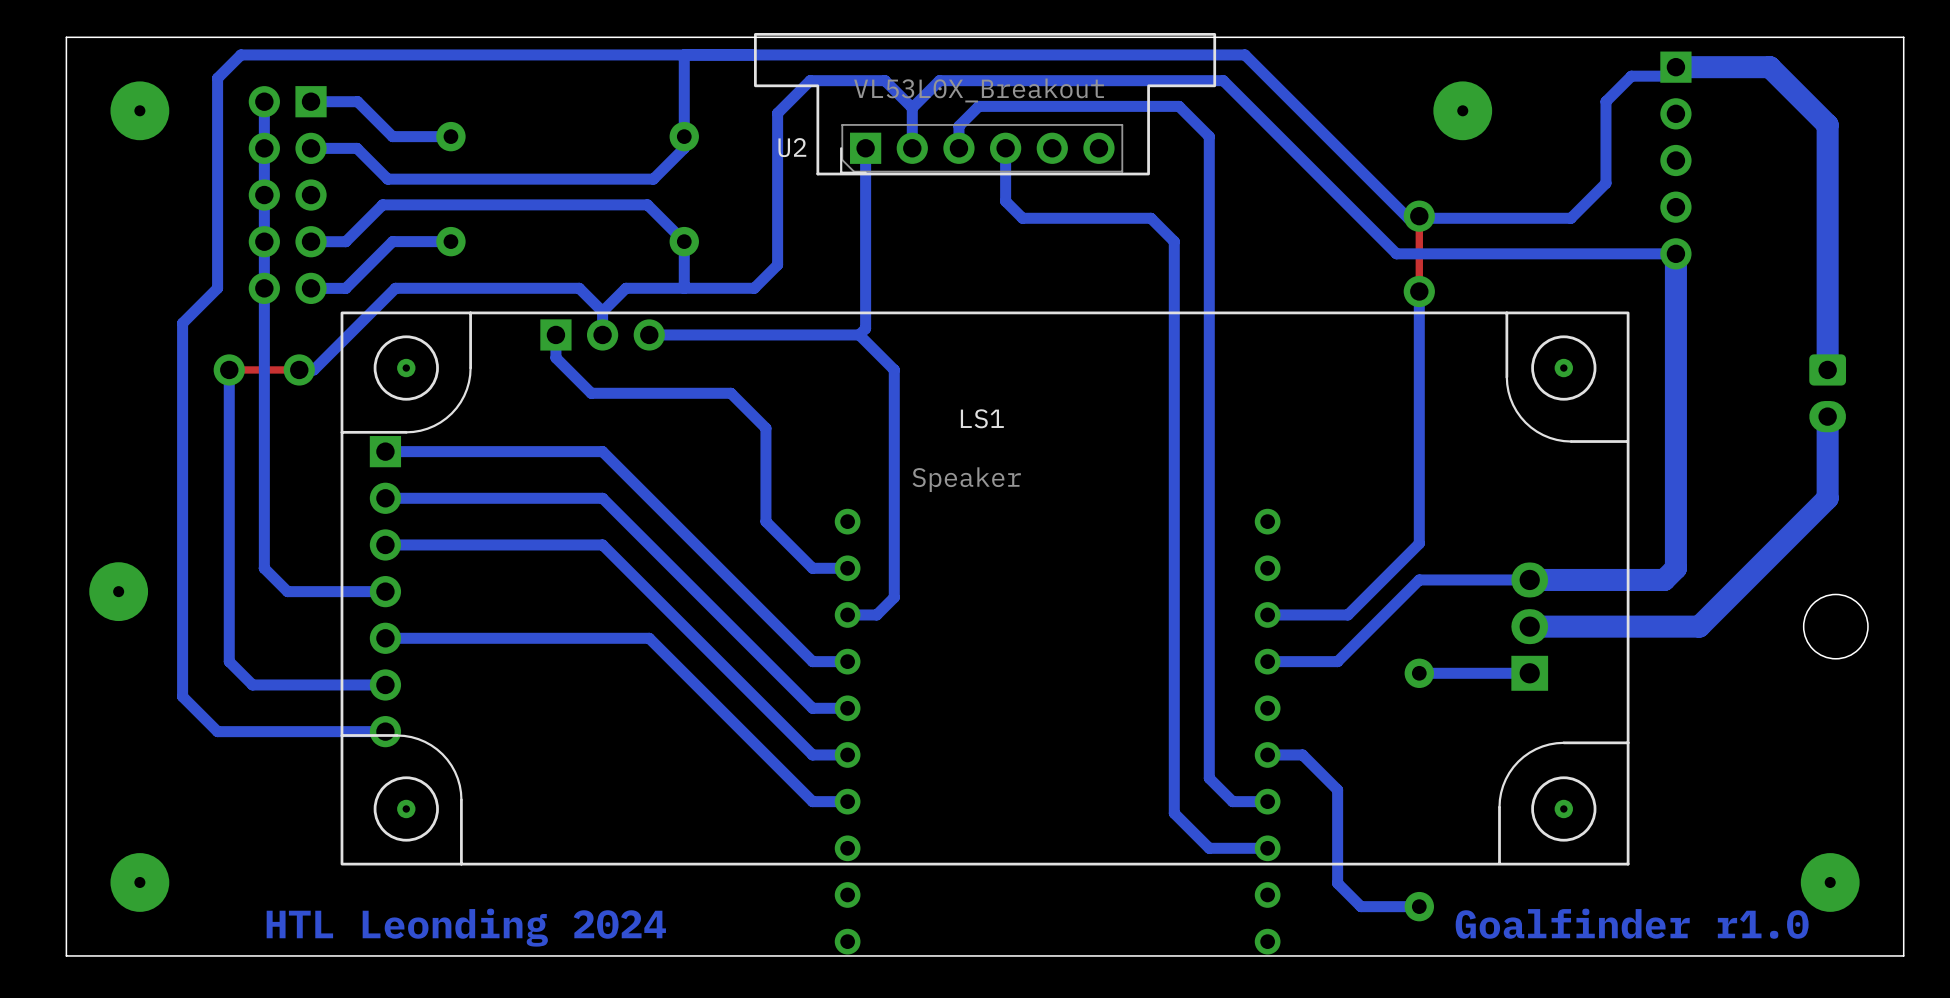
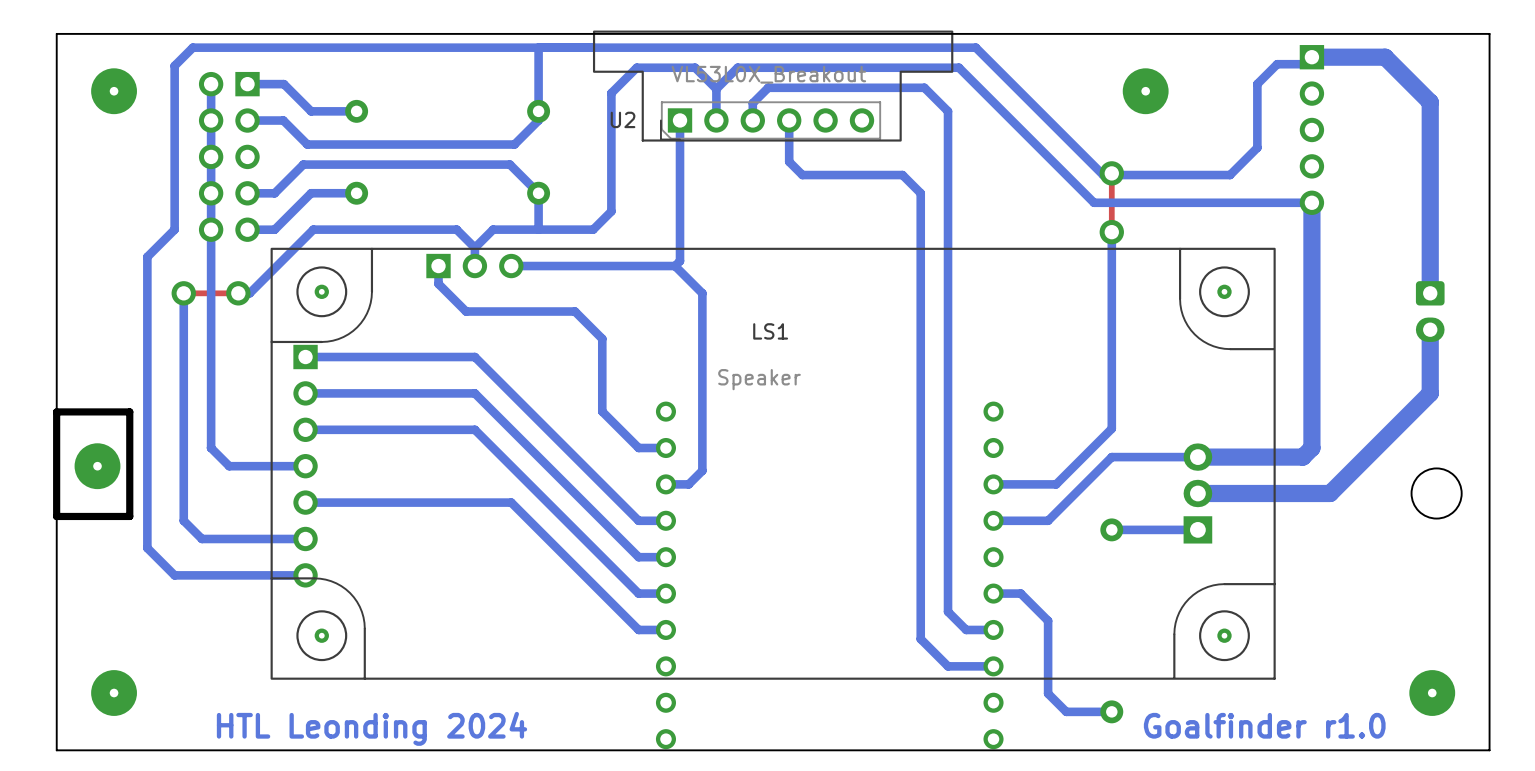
board edge: none -> (129, 411) (56, 411) (56, 516) (129, 516) (129, 411)

